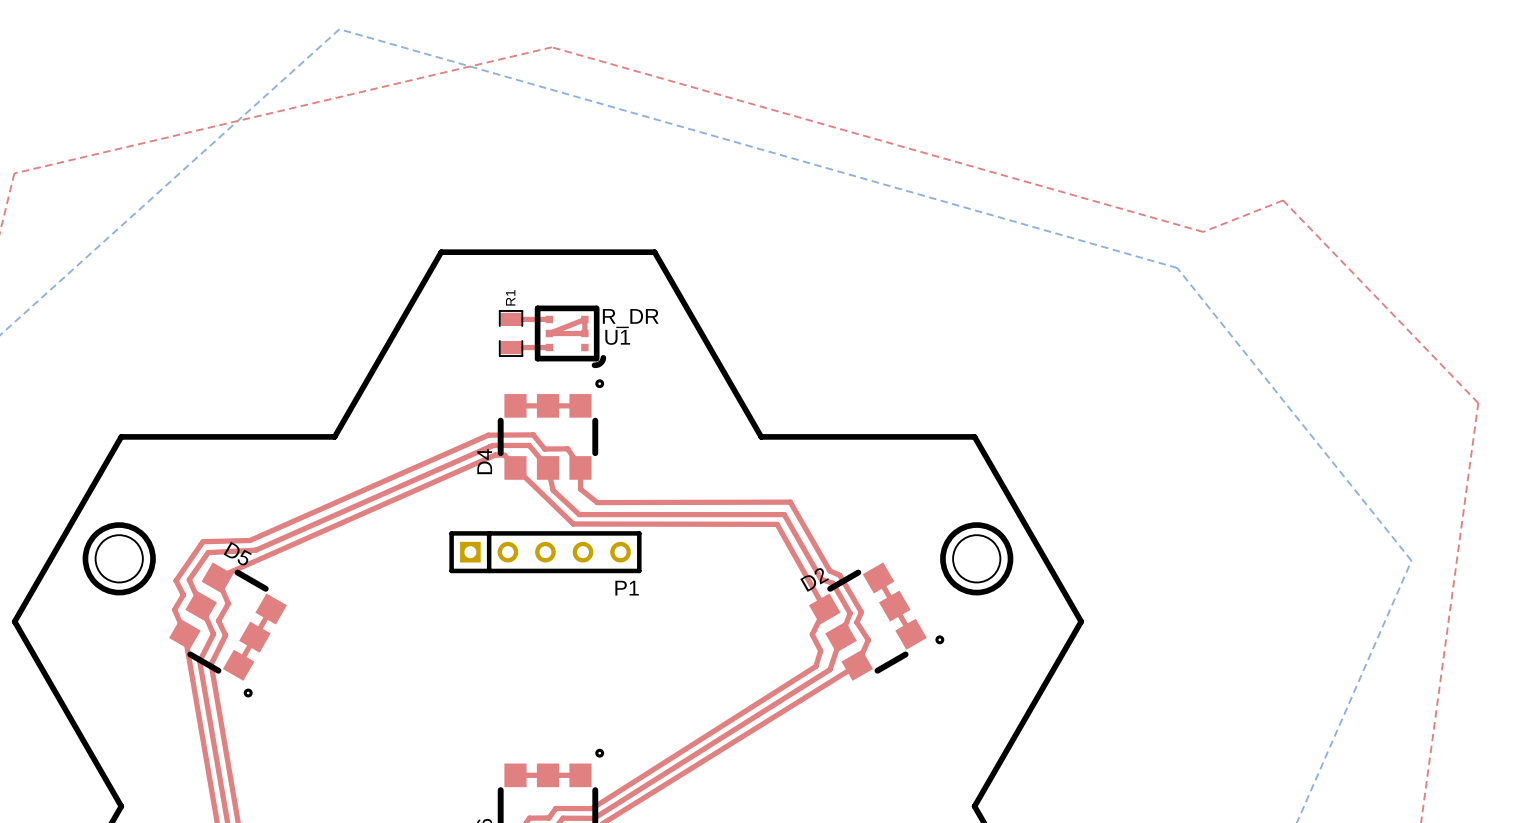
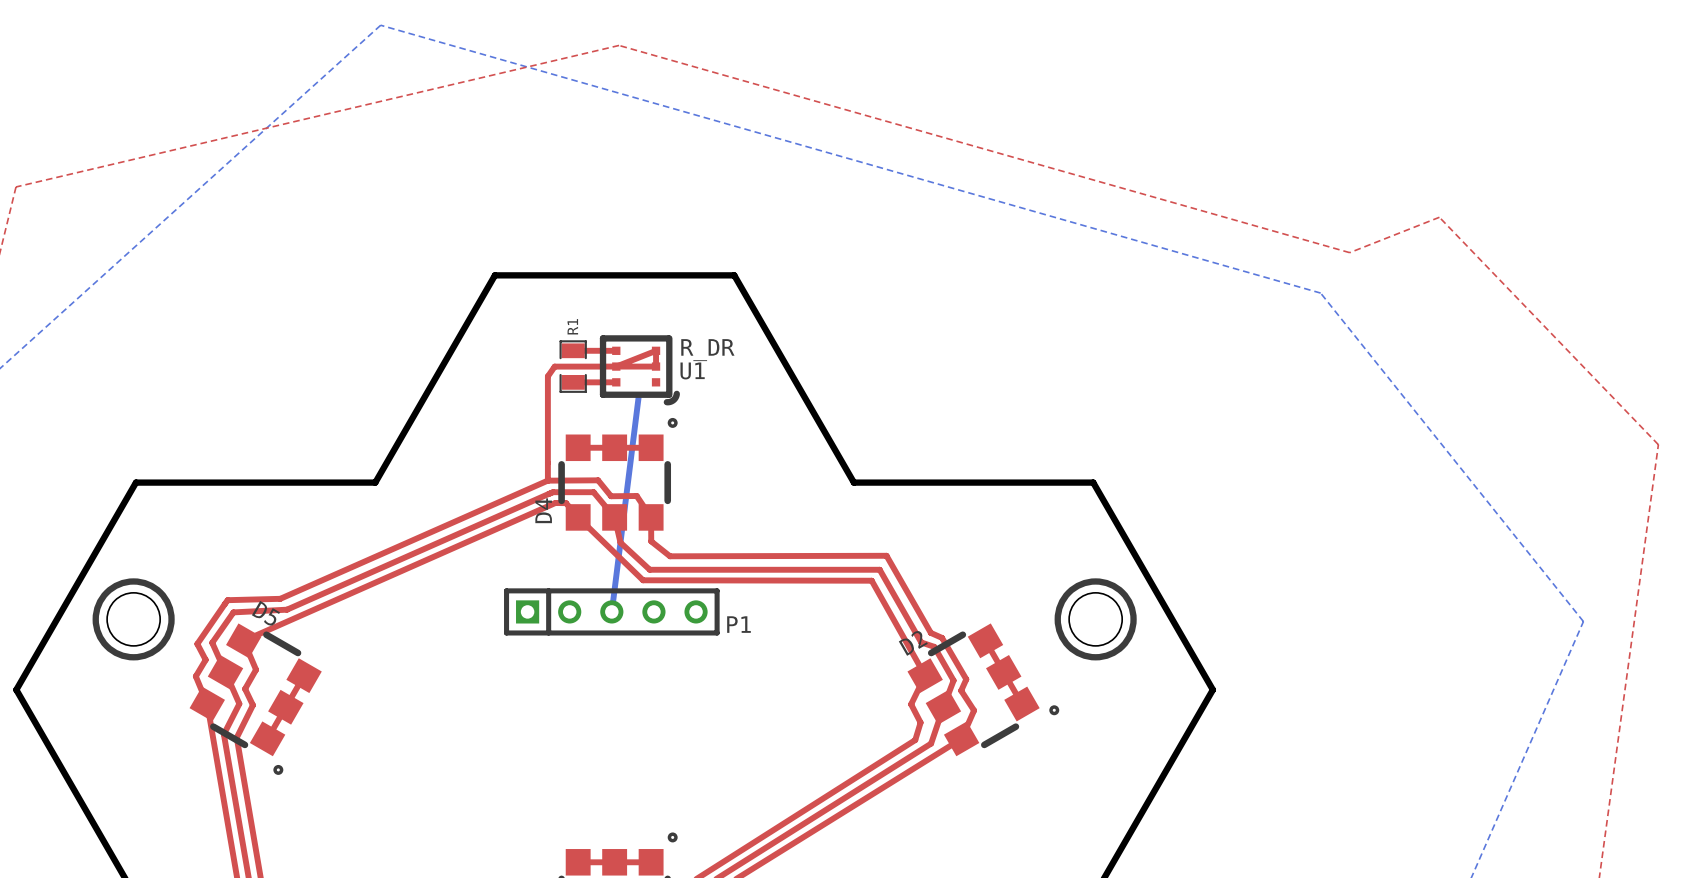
top track: none -> (616, 366) (554, 366) (547, 376) (547, 480)
bottom track: none -> (638, 397) (611, 611)
P1 name position: P1 (627, 588) -> P1 (738, 624)

